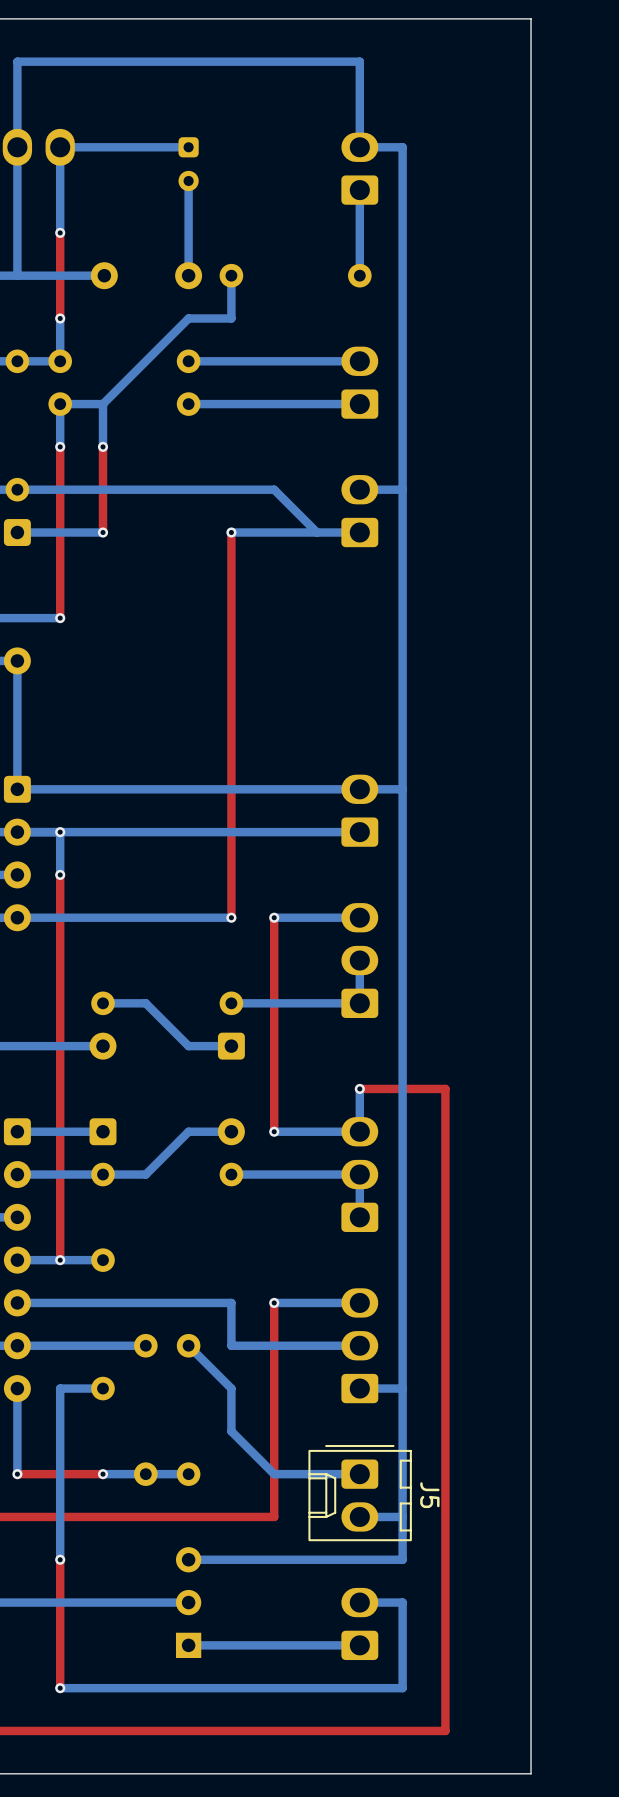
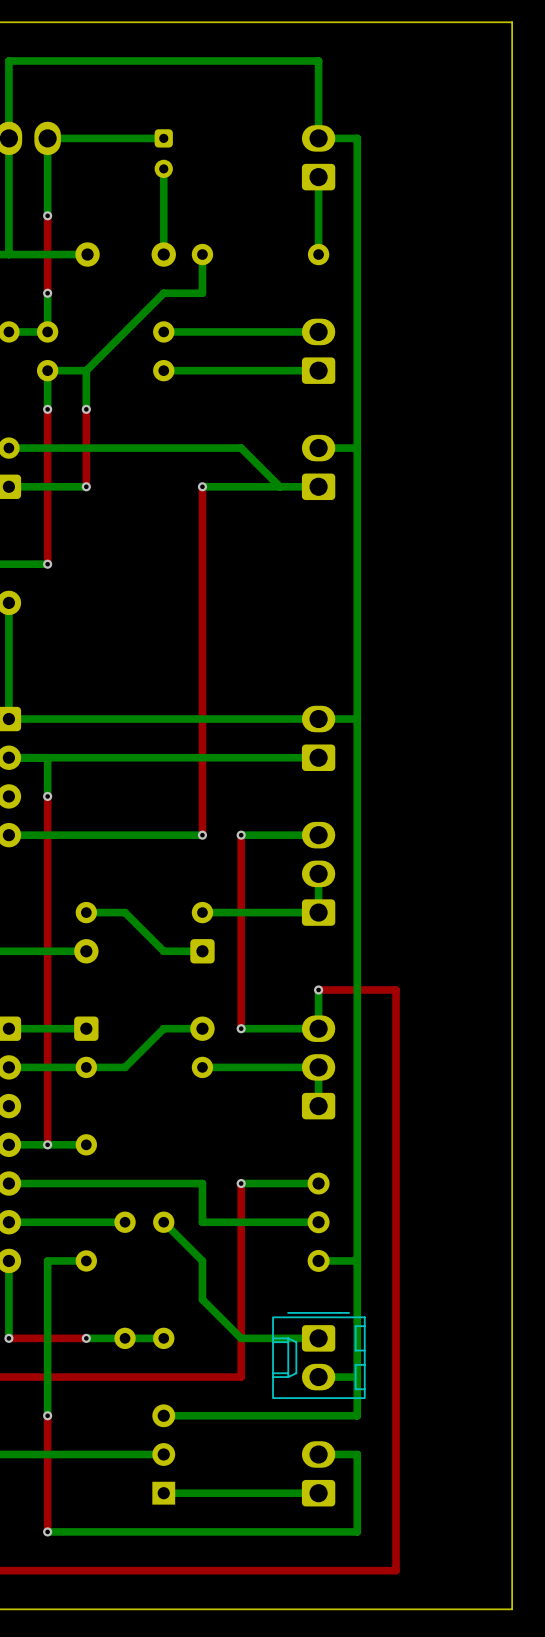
board edge: (531, 18) (531, 1773) -> (473, 22) (512, 22) (512, 1609) (473, 1609)
via: (60, 832) -> none
part footprint: [341, 1288, 379, 1404] -> [307, 1172, 330, 1272]
J5 name: J5 (429, 1495) -> none

